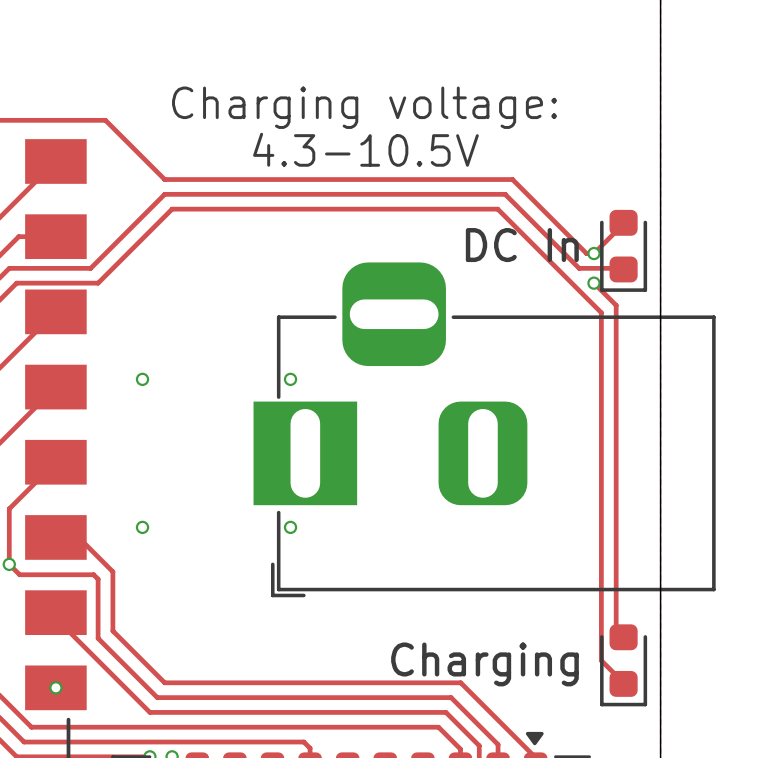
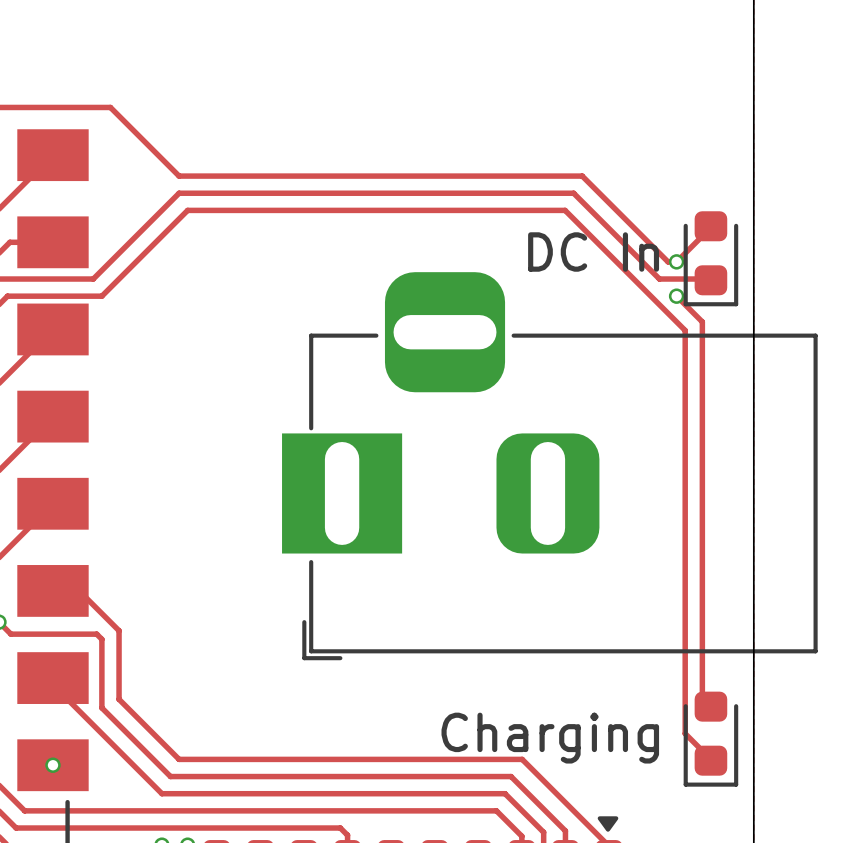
text: Charging voltage: (364, 107) -> none
text: 4.3-10.5V (365, 149) -> none
via: (142, 379) -> none
via: (290, 379) -> none
via: (142, 527) -> none
via: (290, 527) -> none

